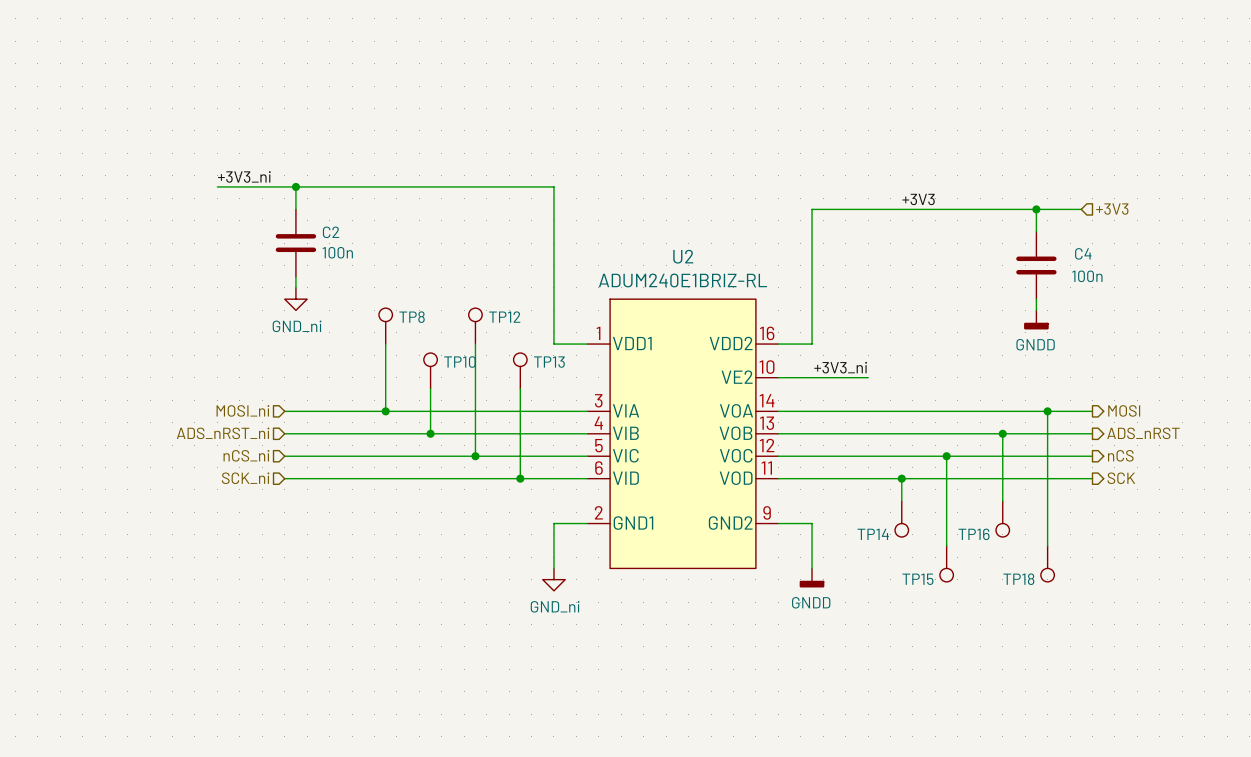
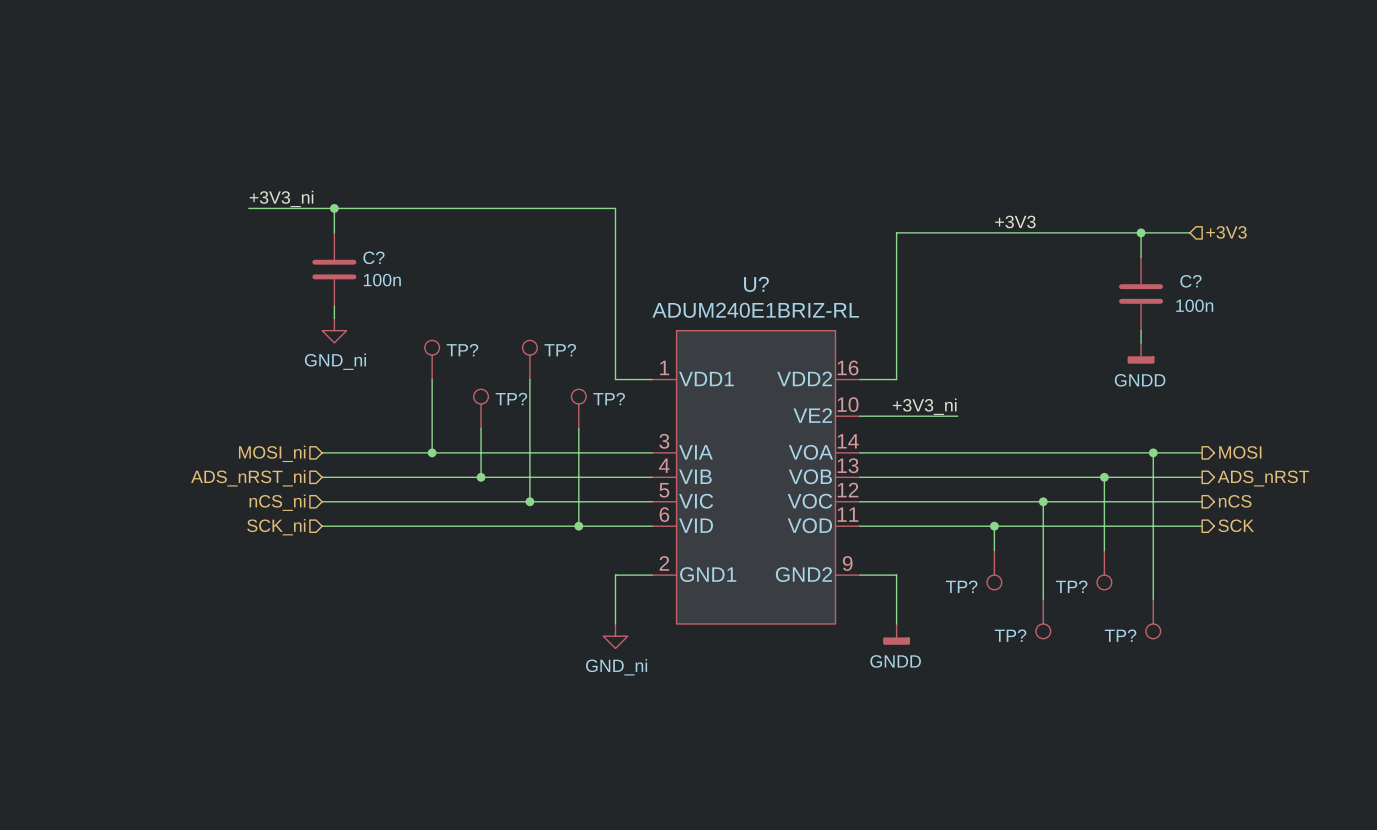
C2 name: C2 (331, 232) -> C? (373, 257)
C4 name: C4 (1083, 253) -> C? (1190, 281)
U2 name: U2 (683, 256) -> U? (756, 284)
TP8 name: TP8 (412, 317) -> TP? (462, 350)
TP12 name: TP12 (504, 317) -> TP? (560, 350)
TP10 name: TP10 (459, 362) -> TP? (511, 399)
TP13 name: TP13 (549, 362) -> TP? (609, 399)
TP14 name: TP14 (873, 534) -> TP? (961, 586)
TP16 name: TP16 (974, 534) -> TP? (1071, 586)
TP15 name: TP15 (917, 579) -> TP? (1010, 635)
TP18 name: TP18 (1018, 579) -> TP? (1120, 635)

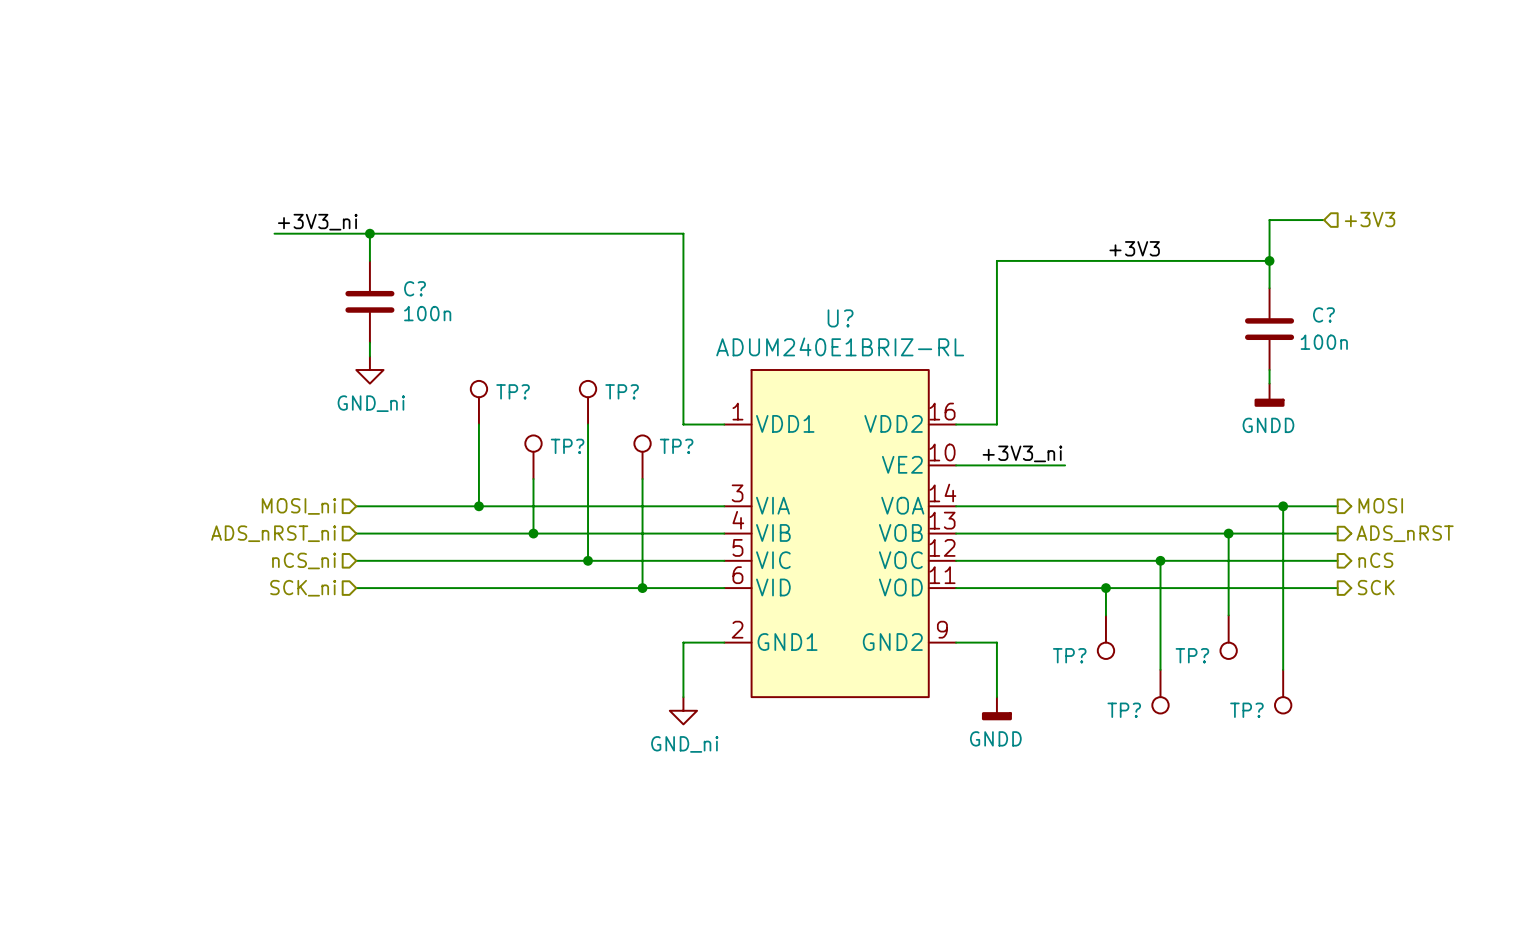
wire: (1141, 232) (1189, 232) -> (1269, 260) (1269, 220) (1324, 220)
hierarchical label position: +3V3 (1226, 232) -> +3V3 (1370, 219)

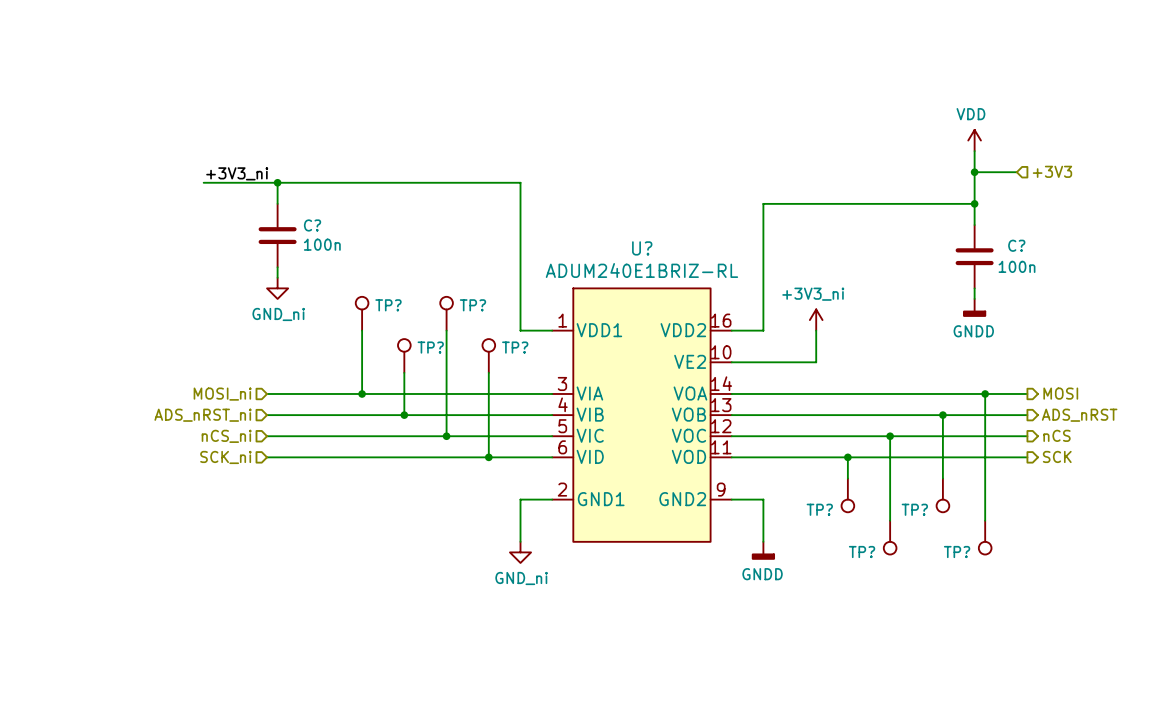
power symbol: none -> VDD (974, 140)
wire: none -> (974, 151) (974, 172)
junction: none -> (974, 172)
label: +3V3 (1134, 248) -> none
power symbol: none -> +3V3_ni (816, 320)
wire: none -> (816, 330) (816, 362)
label: +3V3_ni (1022, 453) -> none

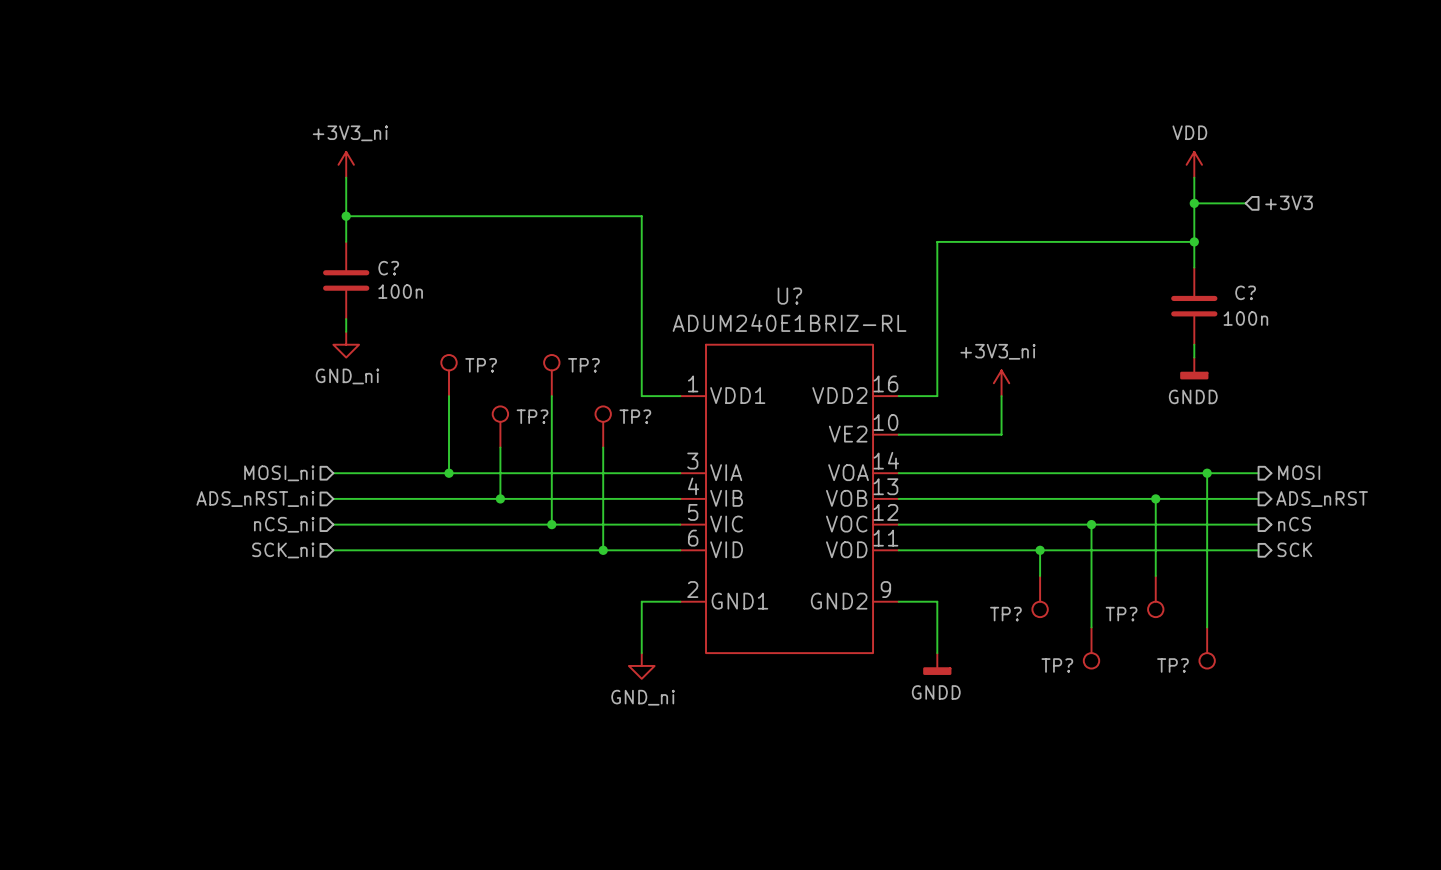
power symbol: none -> +3V3_ni (346, 164)
label: +3V3_ni (237, 173) -> none
wire: (203, 182) (277, 182) -> (346, 177) (346, 216)

